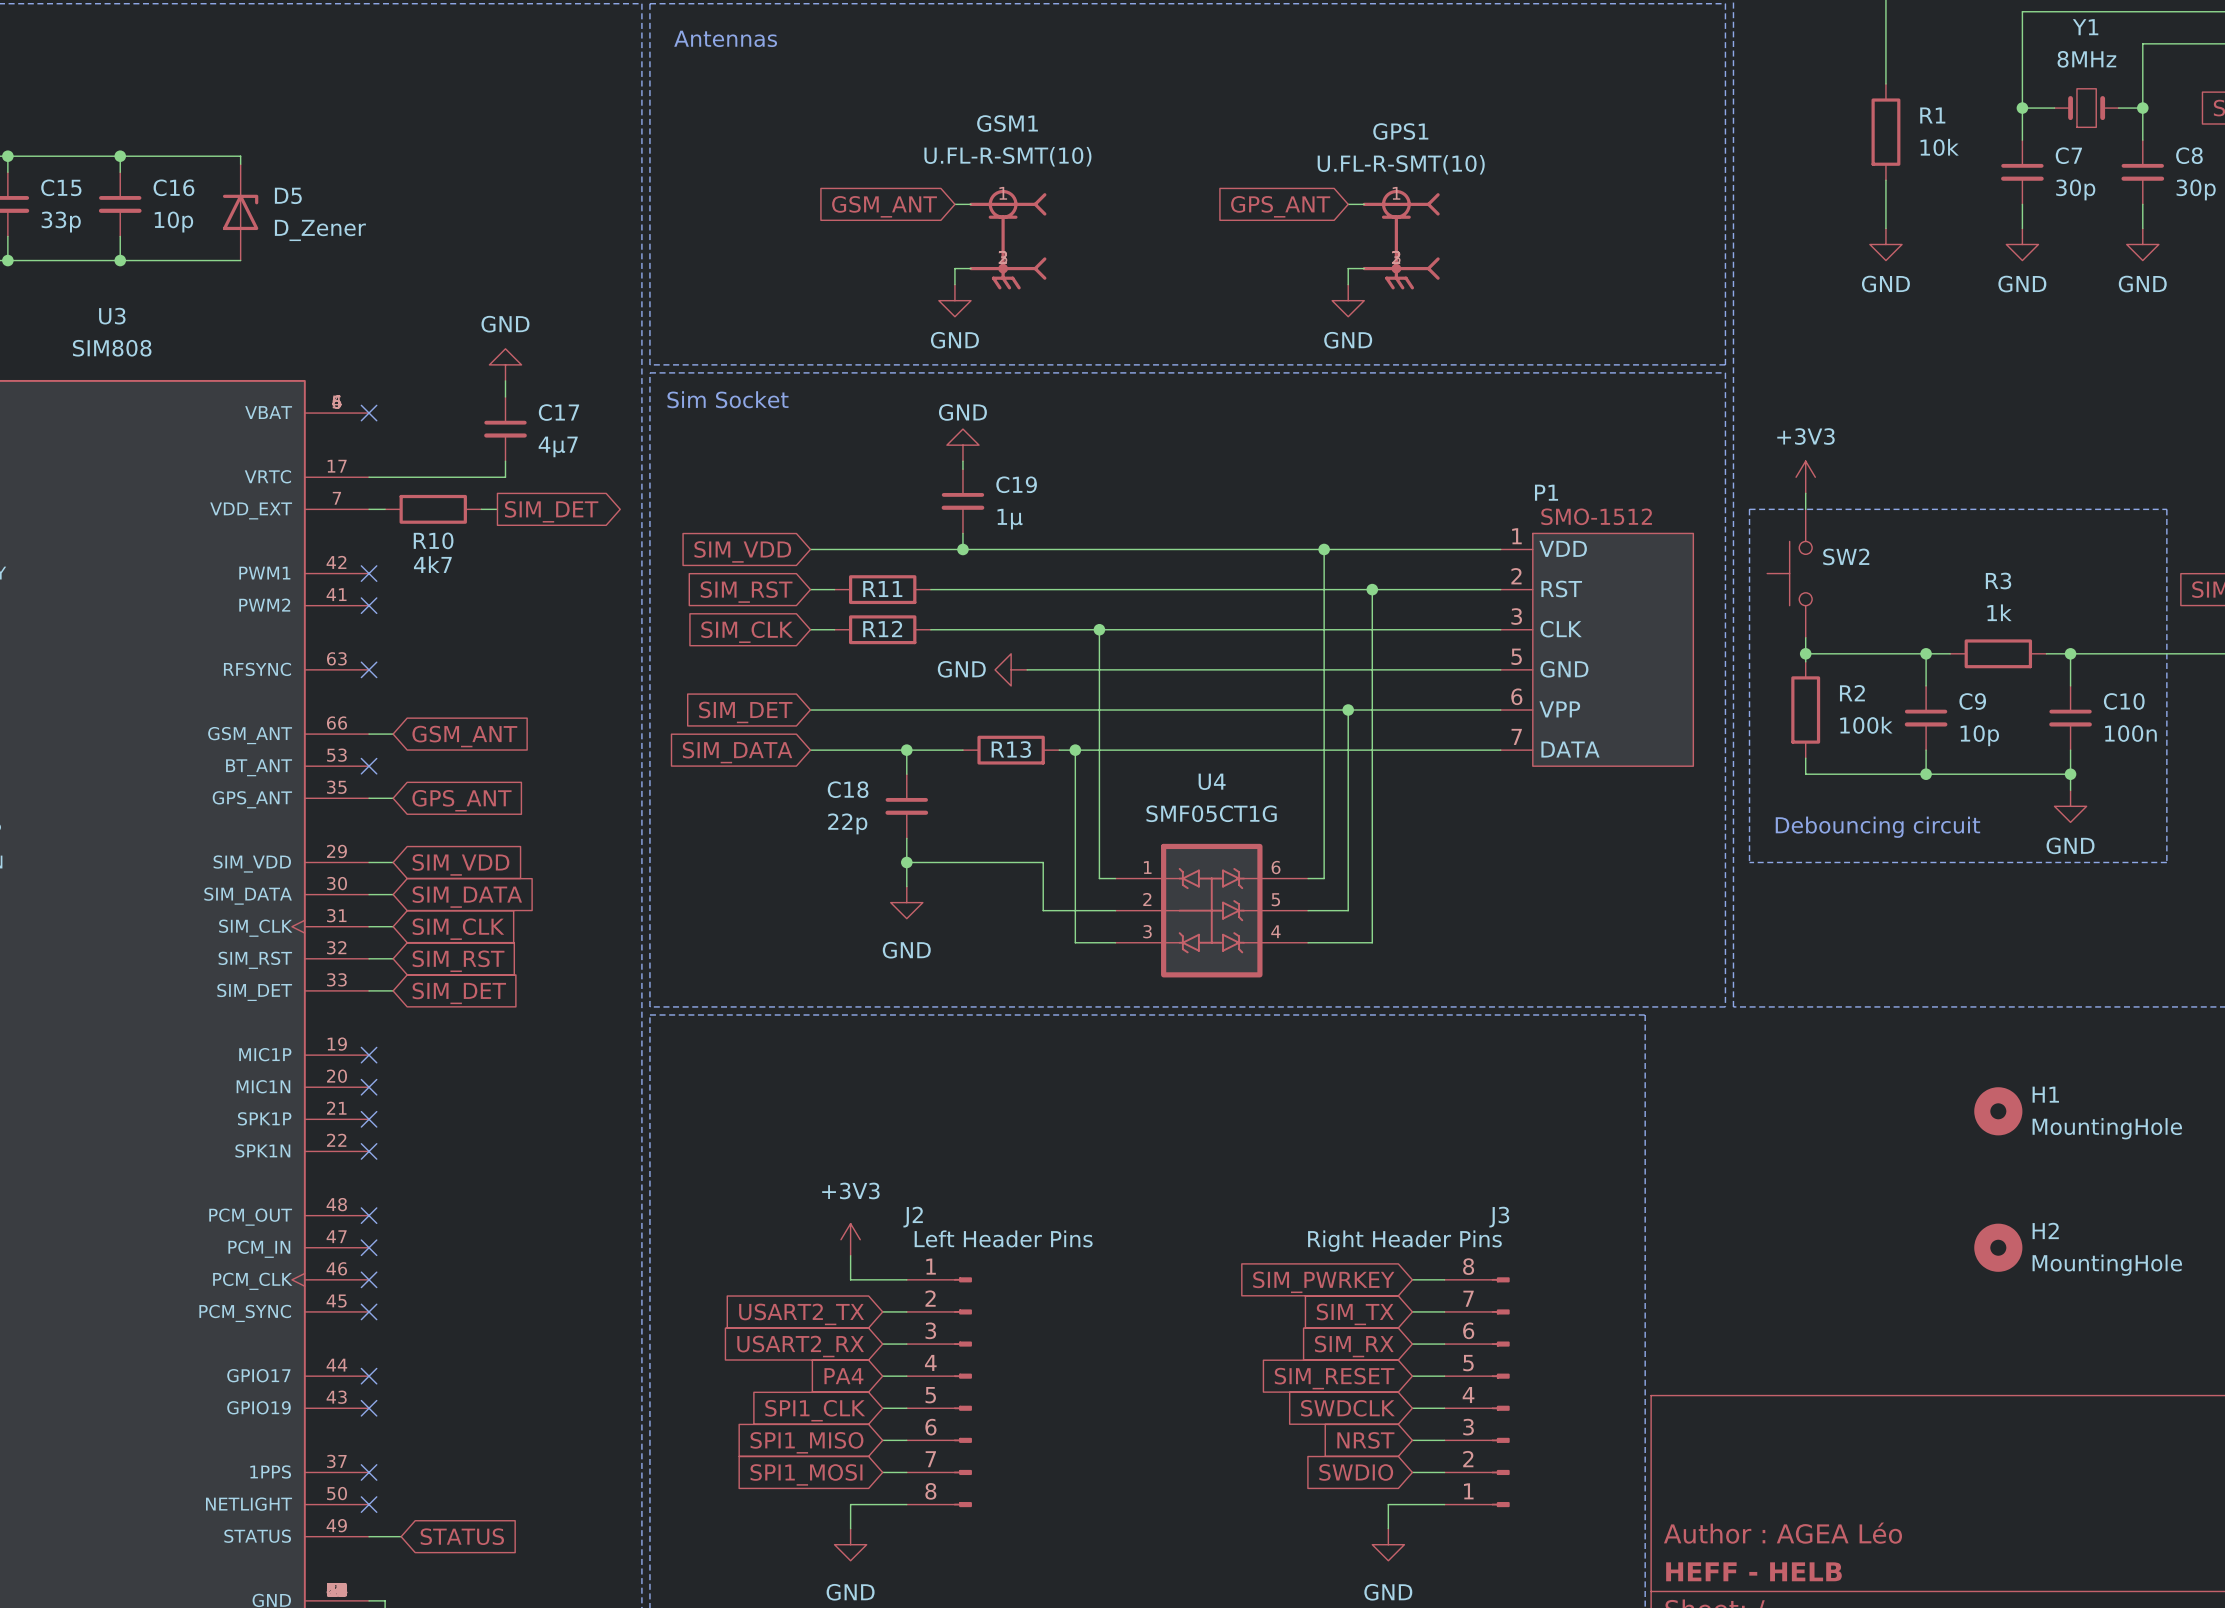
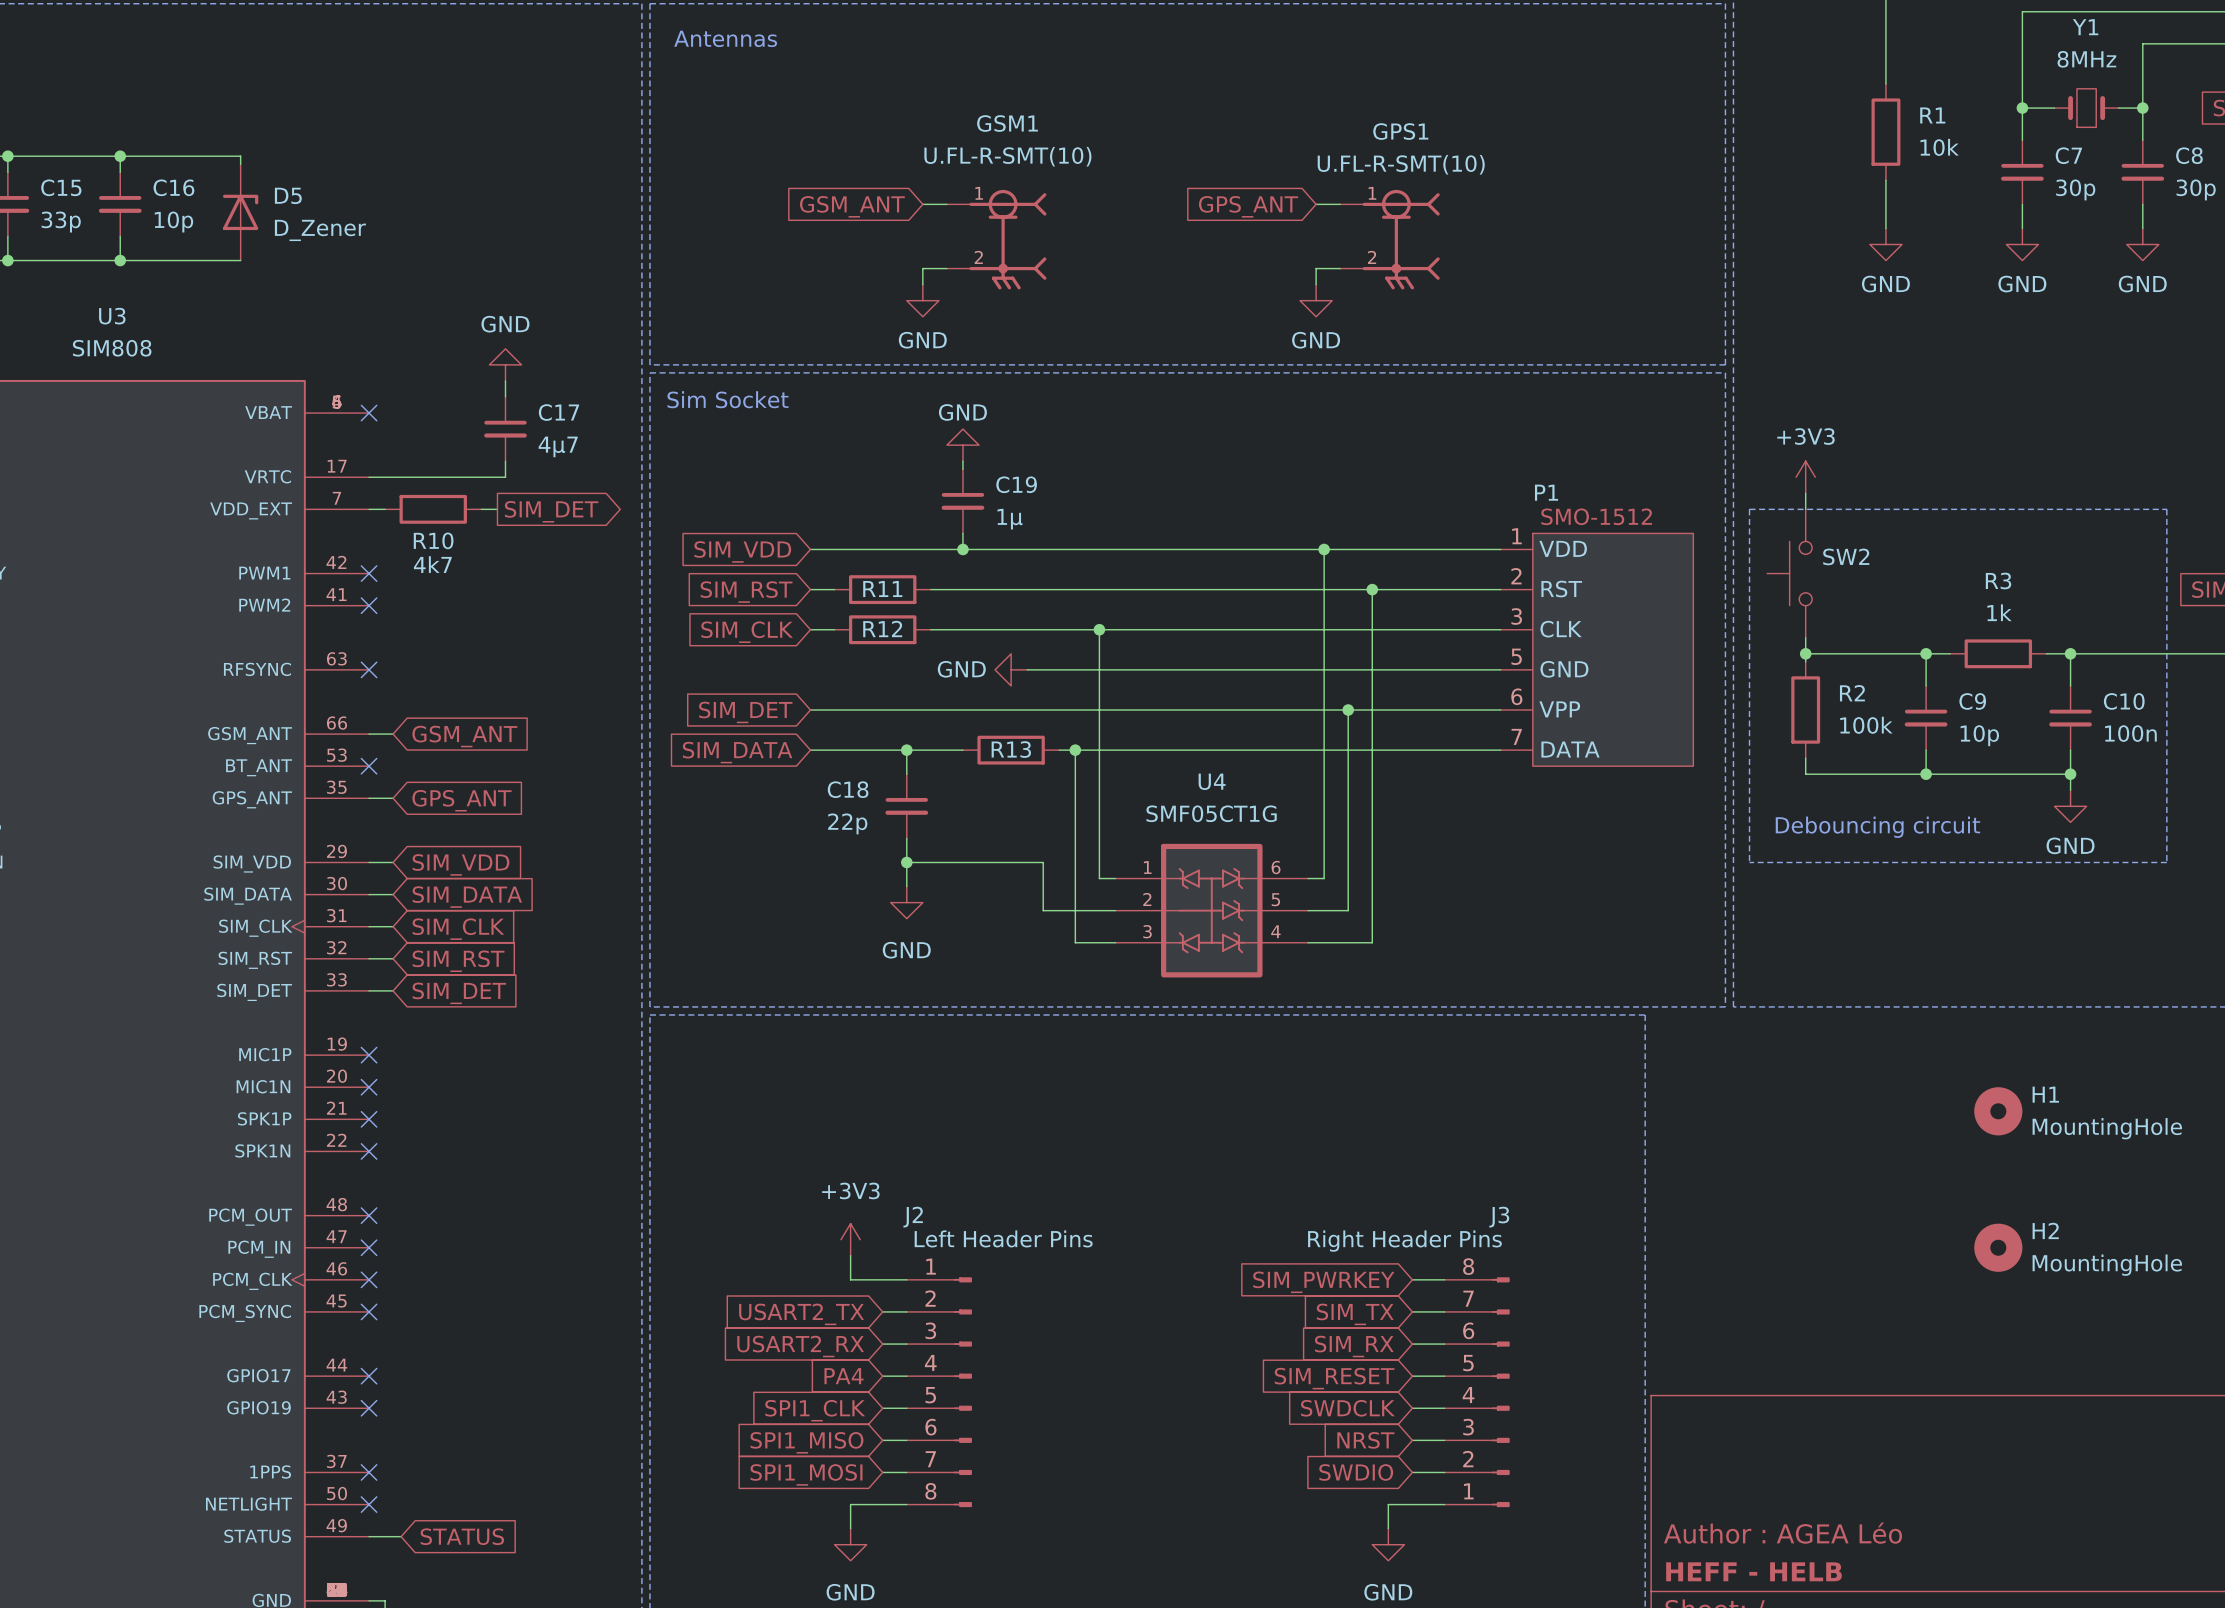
GSM1 symbol: [969, 189, 1047, 290] -> [946, 189, 1047, 290]
GPS1 symbol: [1362, 189, 1440, 290] -> [1340, 189, 1440, 290]
wire: none -> (922, 204) (946, 204)
wire: none -> (1316, 204) (1340, 204)
global label position: GSM_ANT (884, 206) -> GSM_ANT (852, 206)
global label position: GPS_ANT (1280, 206) -> GPS_ANT (1248, 206)
wire: none -> (946, 268) (922, 268) (922, 284)
wire: (970, 268) (954, 268) (954, 284) -> none
wire: none -> (1340, 268) (1316, 268) (1316, 284)
wire: (1364, 268) (1348, 268) (1348, 284) -> none
power symbol position: GND (954, 300) -> GND (922, 300)
power symbol position: GND (1348, 300) -> GND (1316, 300)

